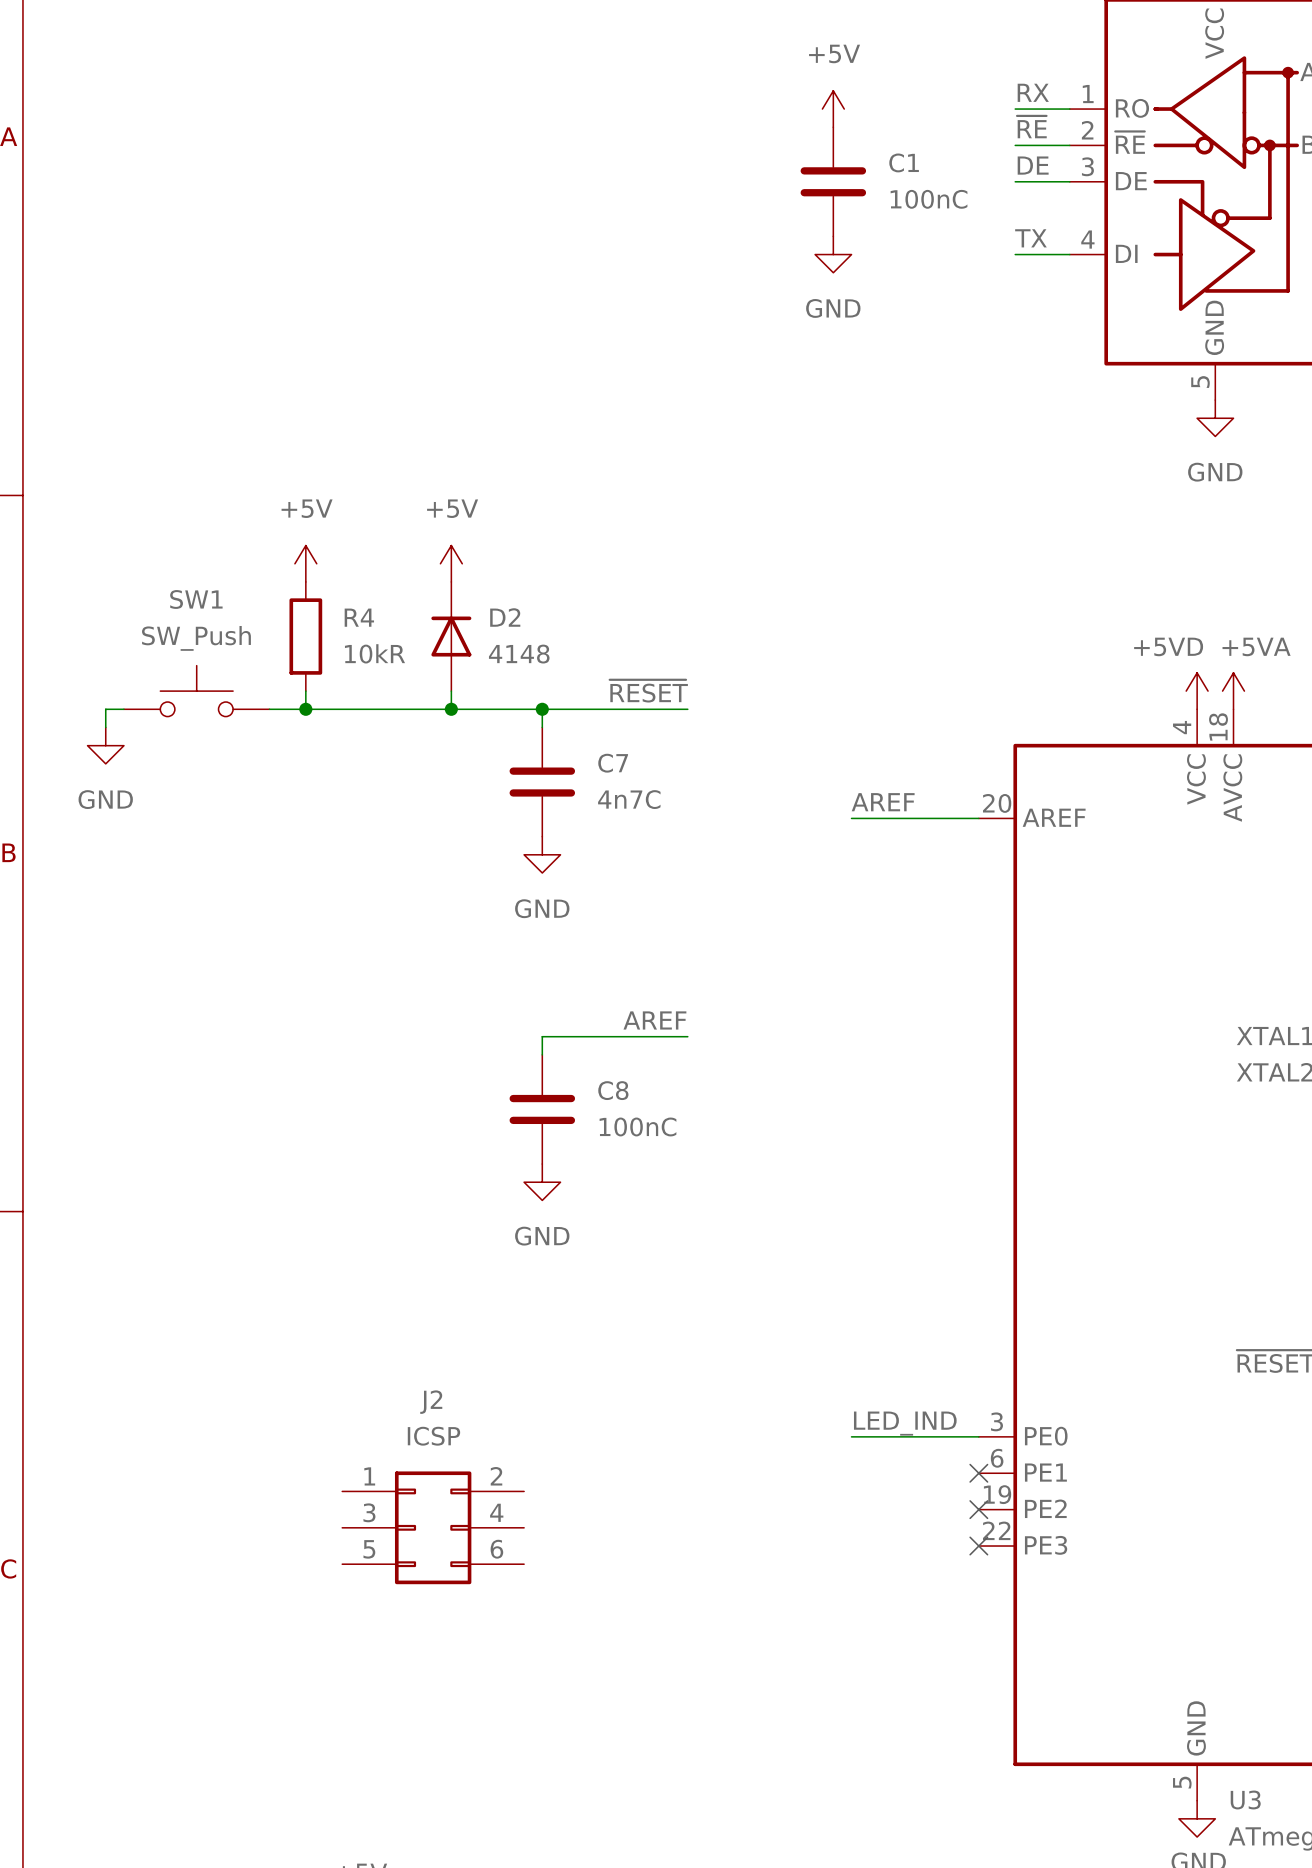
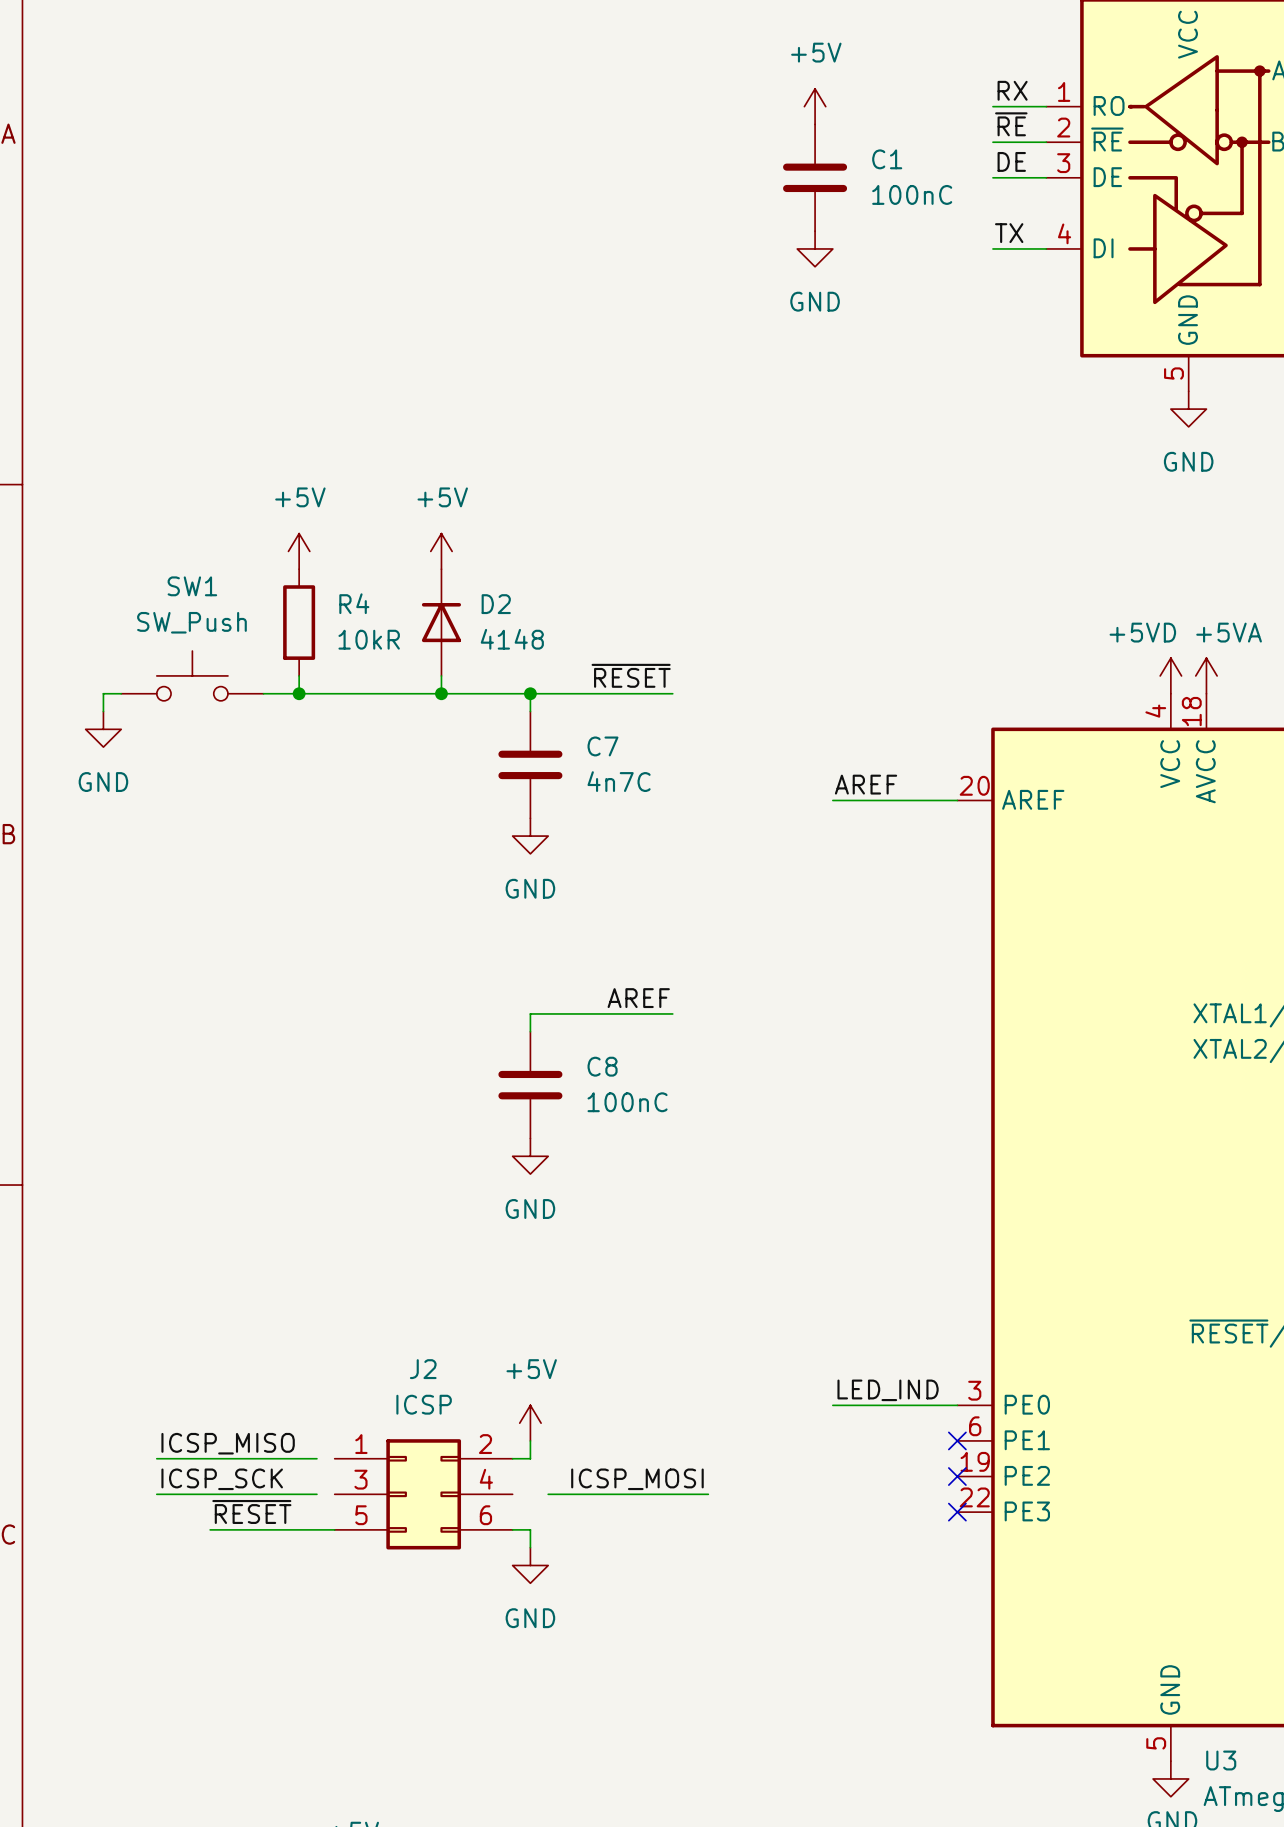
power symbol: none -> +5V (530, 1423)
wire: none -> (530, 1440) (530, 1458) (512, 1458)
label: none -> ICSP_MISO (228, 1443)
wire: none -> (156, 1458) (316, 1458)
label: none -> ICSP_SCK (222, 1479)
label: none -> ICSP_MOSI (637, 1479)
wire: none -> (156, 1494) (316, 1494)
wire: none -> (548, 1494) (708, 1494)
label: none -> ~{RESET} (251, 1511)
wire: none -> (210, 1529) (334, 1529)
wire: none -> (512, 1529) (530, 1529) (530, 1547)
power symbol: none -> GND (530, 1565)

